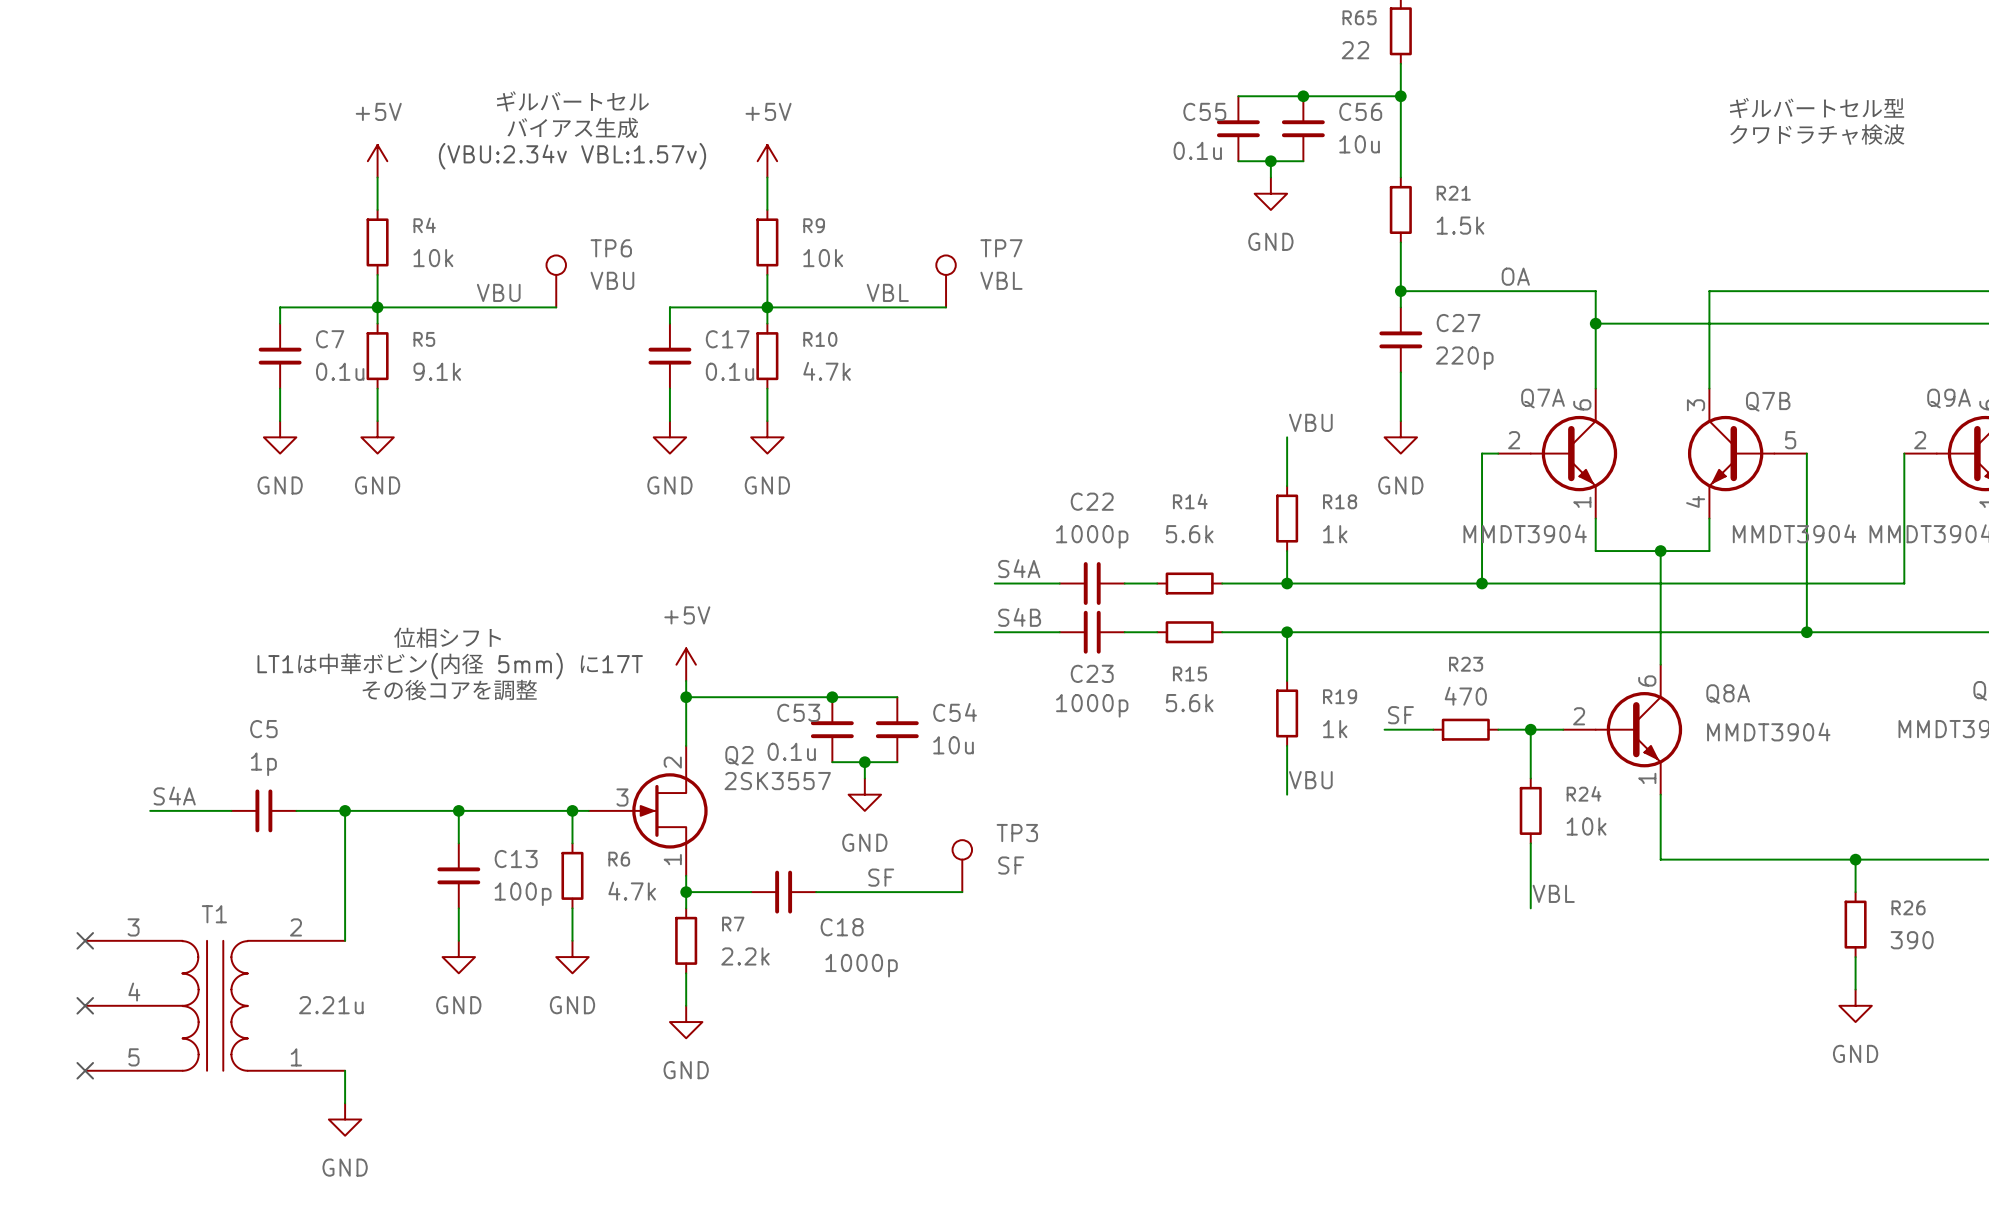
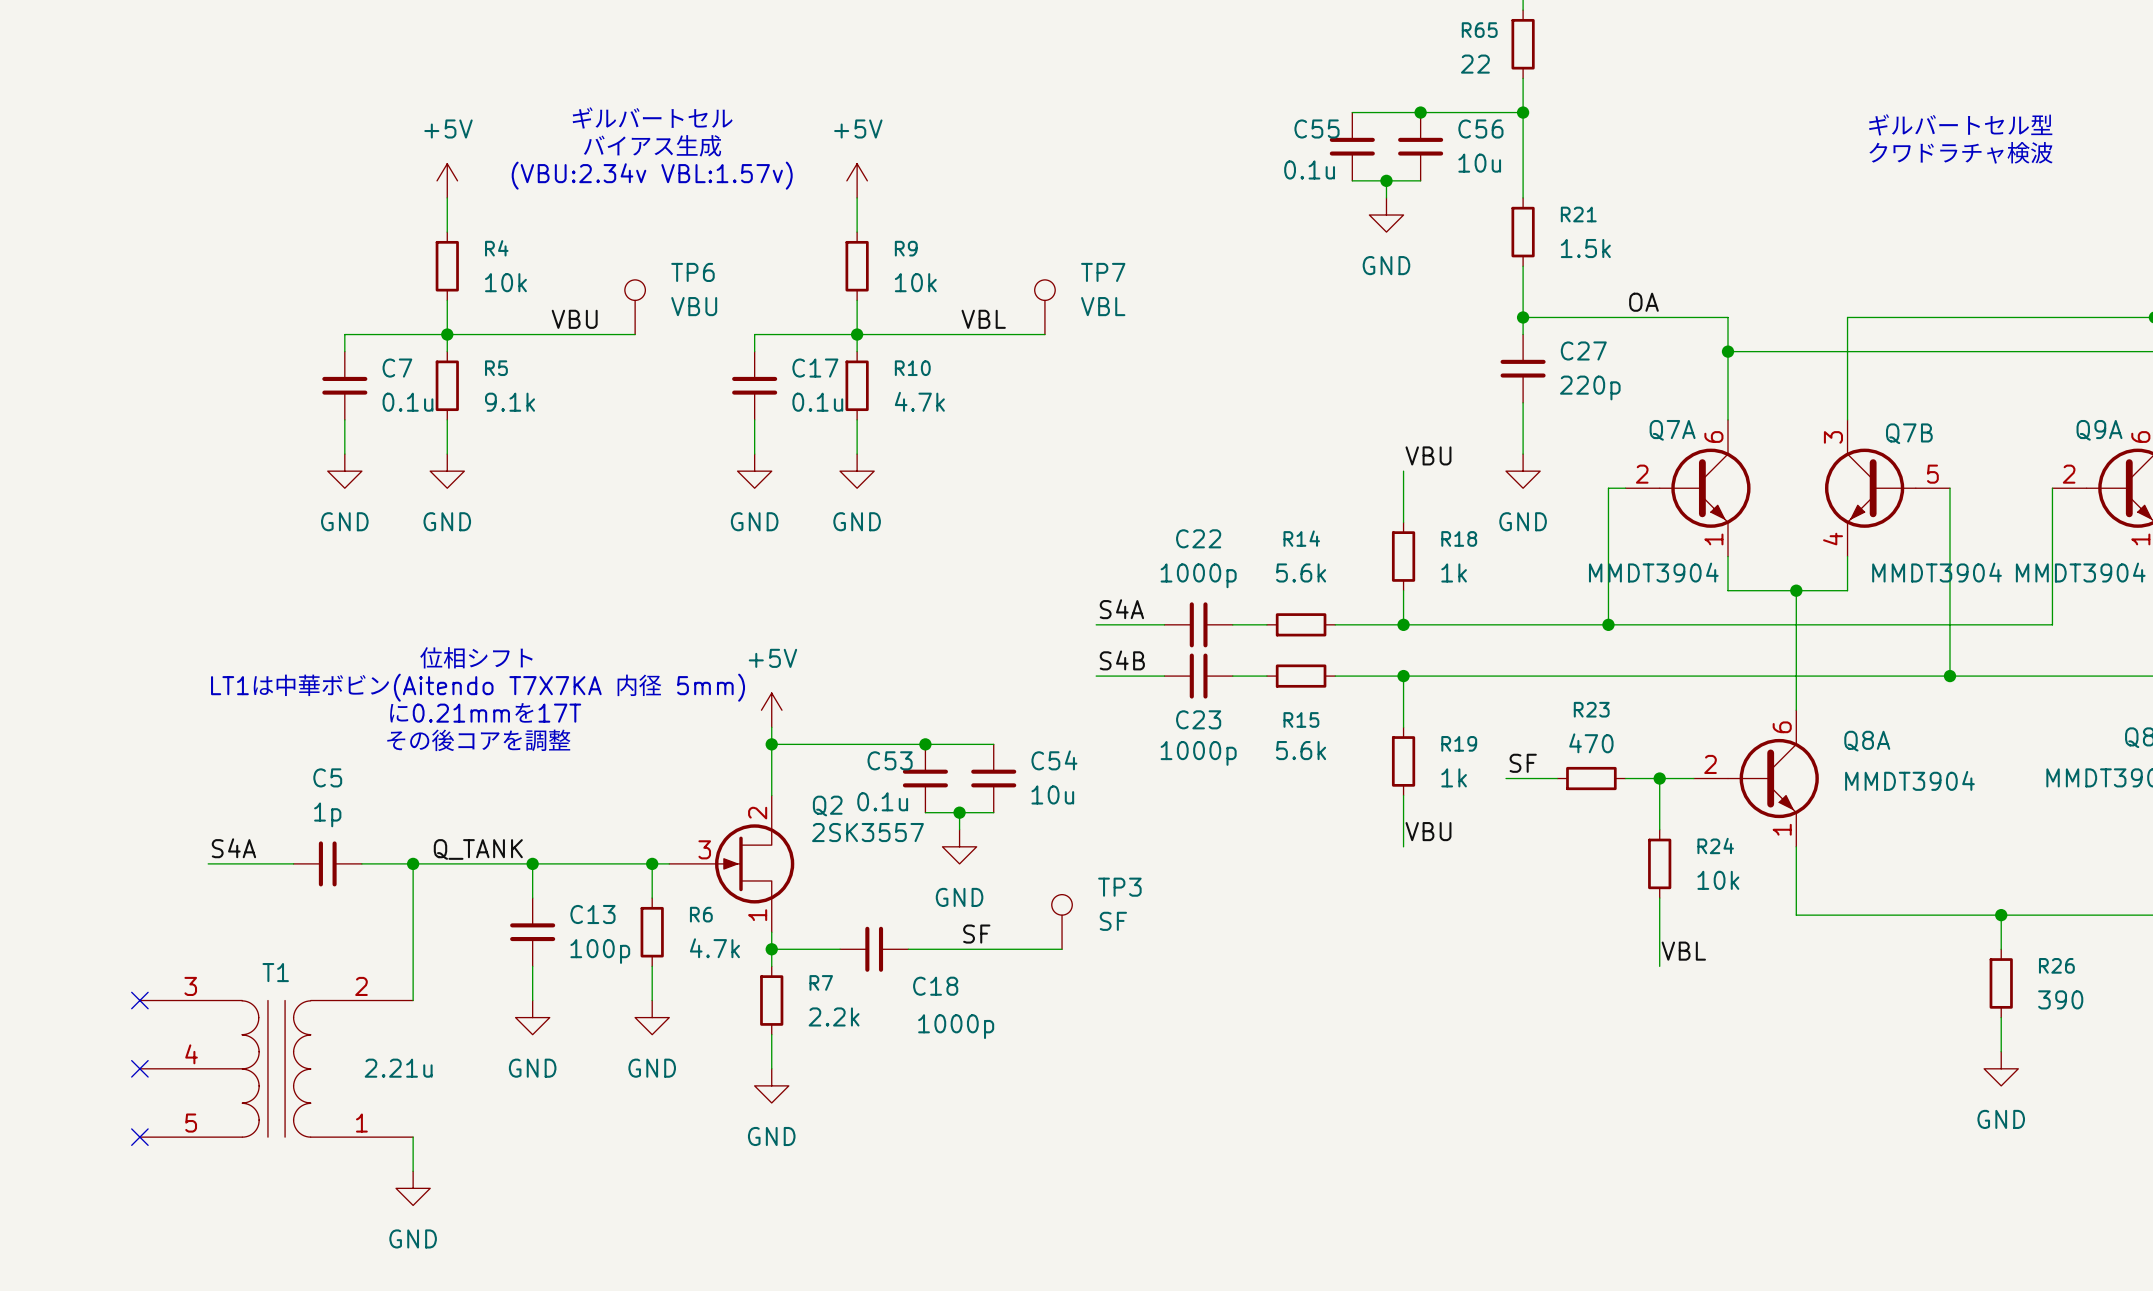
text position: 位相シフト (447, 637) -> 位相シフト (476, 657)
text: LT1は中華ボビン(内径 5mm) に17T (450, 666) -> LT1は中華ボビン(Aitendo T7X7KA 内径 5mm) (478, 687)
text: none -> に0.21mmを17T (485, 712)
text position: その後コアを調整 (449, 690) -> その後コアを調整 (478, 740)
label: none -> Q_TANK (478, 849)

